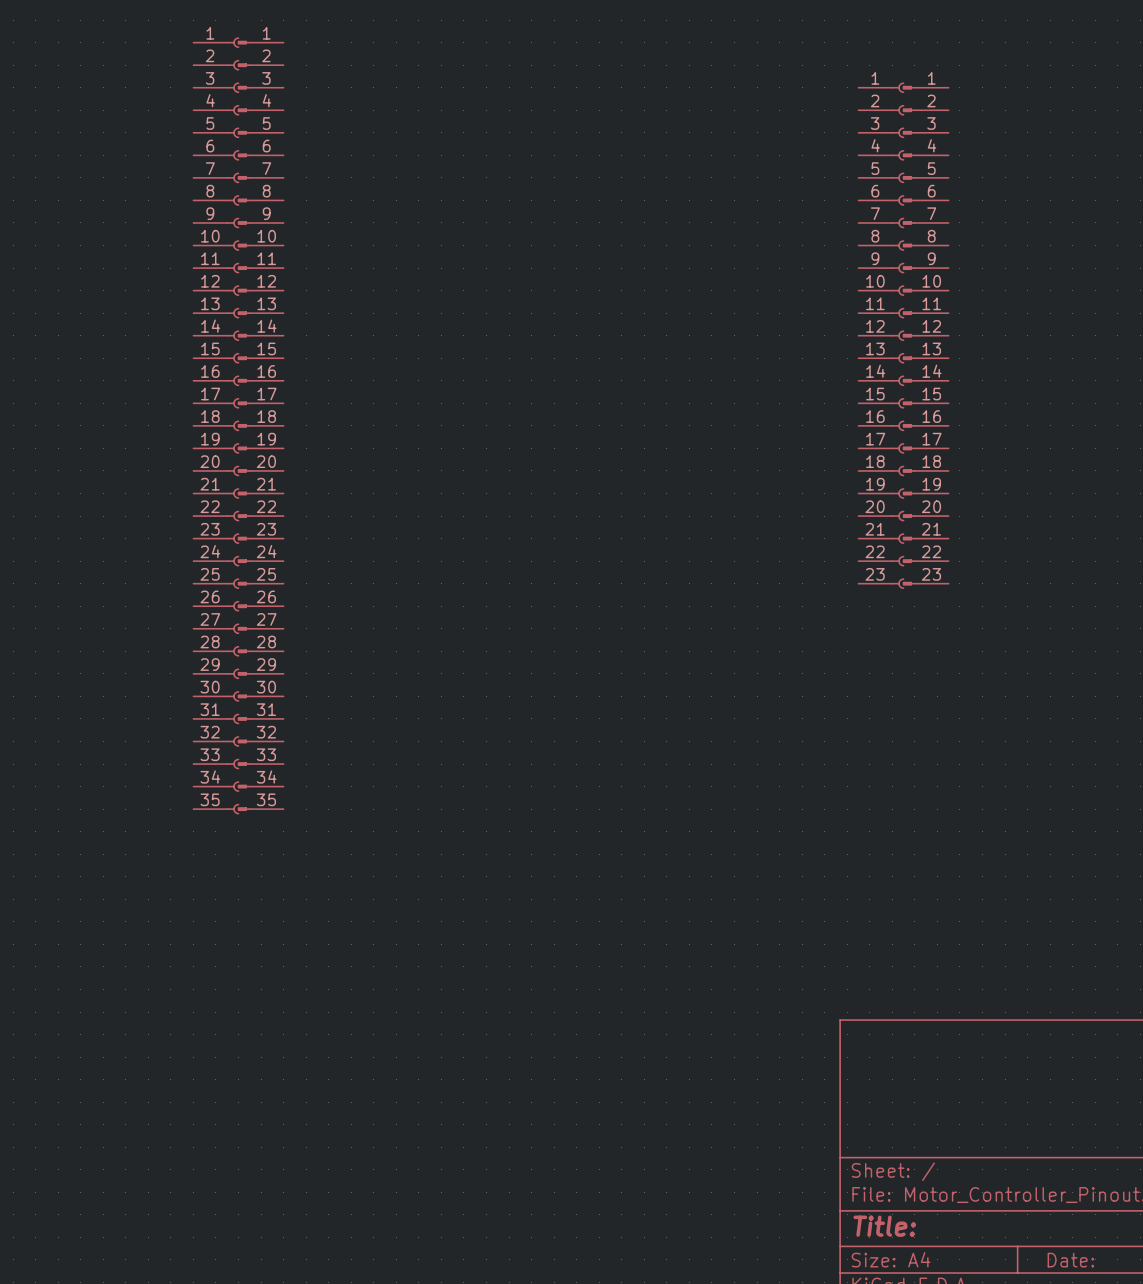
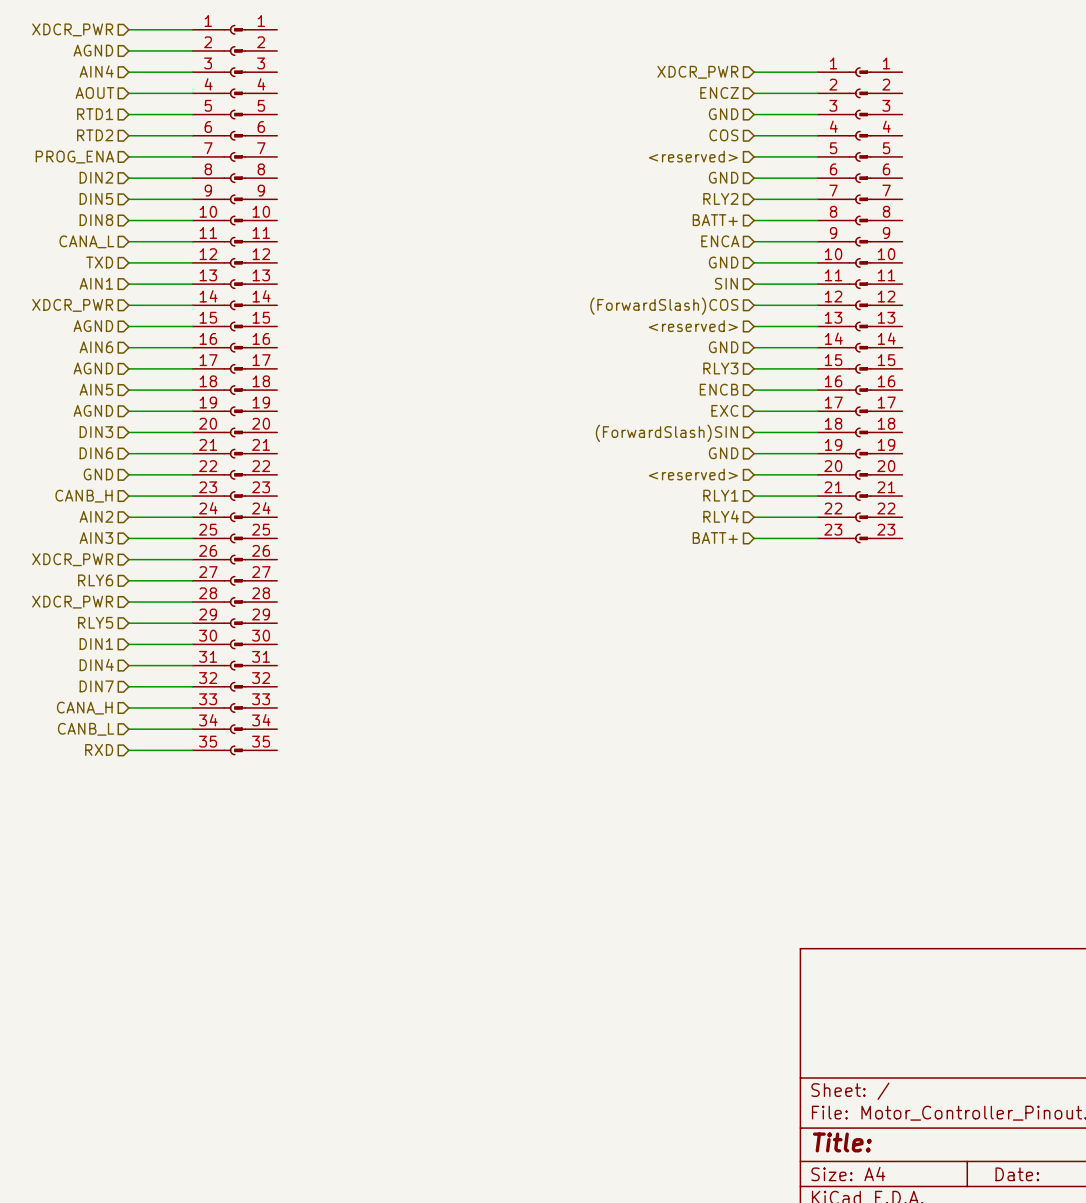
hierarchical label: none -> XDCR_PWR (72, 29)
wire: none -> (128, 29) (192, 29)
hierarchical label: none -> AGND (93, 50)
wire: none -> (128, 50) (192, 50)
hierarchical label: none -> AIN4 (96, 71)
wire: none -> (128, 72) (192, 72)
hierarchical label: none -> XDCR_PWR (697, 72)
wire: none -> (754, 72) (817, 72)
hierarchical label: none -> AOUT (94, 92)
hierarchical label: none -> ENCZ (719, 92)
wire: none -> (128, 93) (192, 93)
wire: none -> (754, 93) (817, 93)
hierarchical label: none -> RTD1 (95, 114)
wire: none -> (128, 114) (192, 114)
hierarchical label: none -> GND (723, 114)
wire: none -> (754, 114) (817, 114)
hierarchical label: none -> RTD2 (95, 135)
hierarchical label: none -> COS (723, 135)
wire: none -> (128, 135) (192, 135)
wire: none -> (754, 135) (817, 135)
wire: none -> (128, 156) (192, 156)
hierarchical label: none -> <reserved> (693, 156)
wire: none -> (754, 156) (817, 156)
hierarchical label: none -> PROG_ENA (74, 157)
hierarchical label: none -> DIN2 (96, 177)
wire: none -> (128, 178) (192, 178)
hierarchical label: none -> GND (723, 177)
wire: none -> (754, 178) (817, 178)
hierarchical label: none -> DIN5 (96, 198)
wire: none -> (128, 199) (192, 199)
hierarchical label: none -> RLY2 (720, 198)
wire: none -> (754, 199) (817, 199)
hierarchical label: none -> DIN8 (96, 220)
wire: none -> (128, 220) (192, 220)
hierarchical label: none -> BATT+ (715, 220)
wire: none -> (754, 220) (817, 220)
hierarchical label: none -> ENCA (720, 241)
hierarchical label: none -> CANA_L (86, 241)
wire: none -> (128, 241) (192, 241)
wire: none -> (754, 241) (817, 241)
hierarchical label: none -> TXD (99, 262)
wire: none -> (128, 262) (192, 262)
hierarchical label: none -> GND (723, 262)
wire: none -> (754, 262) (817, 262)
hierarchical label: none -> AIN1 (96, 283)
hierarchical label: none -> SIN (726, 283)
wire: none -> (128, 284) (192, 284)
wire: none -> (754, 284) (817, 284)
hierarchical label: none -> XDCR_PWR (72, 305)
wire: none -> (128, 305) (192, 305)
wire: none -> (754, 305) (817, 305)
hierarchical label: none -> (ForwardSlash)COS (664, 306)
hierarchical label: none -> AGND (93, 326)
hierarchical label: none -> <reserved> (693, 326)
wire: none -> (128, 326) (192, 326)
wire: none -> (754, 326) (817, 326)
hierarchical label: none -> AIN6 (96, 347)
wire: none -> (128, 347) (192, 347)
hierarchical label: none -> GND (723, 347)
wire: none -> (754, 347) (817, 347)
hierarchical label: none -> AGND (93, 368)
hierarchical label: none -> RLY3 (720, 368)
wire: none -> (128, 368) (192, 368)
wire: none -> (754, 368) (817, 368)
hierarchical label: none -> AIN5 (96, 389)
wire: none -> (128, 390) (192, 390)
hierarchical label: none -> ENCB (719, 389)
wire: none -> (754, 390) (817, 390)
hierarchical label: none -> AGND (93, 410)
wire: none -> (128, 411) (192, 411)
hierarchical label: none -> EXC (724, 410)
wire: none -> (754, 411) (817, 411)
hierarchical label: none -> DIN3 (96, 432)
wire: none -> (128, 432) (192, 432)
wire: none -> (754, 432) (817, 432)
hierarchical label: none -> (ForwardSlash)SIN (666, 433)
hierarchical label: none -> DIN6 (96, 453)
wire: none -> (128, 453) (192, 453)
hierarchical label: none -> GND (723, 453)
wire: none -> (754, 453) (817, 453)
hierarchical label: none -> GND (98, 474)
hierarchical label: none -> <reserved> (693, 474)
wire: none -> (128, 474) (192, 474)
wire: none -> (754, 474) (817, 474)
hierarchical label: none -> CANB_H (84, 496)
wire: none -> (128, 496) (192, 496)
hierarchical label: none -> RLY1 (720, 495)
wire: none -> (754, 496) (817, 496)
hierarchical label: none -> AIN2 (96, 516)
hierarchical label: none -> RLY4 (721, 516)
wire: none -> (128, 517) (192, 517)
wire: none -> (754, 517) (817, 517)
hierarchical label: none -> AIN3 (96, 538)
wire: none -> (128, 538) (192, 538)
hierarchical label: none -> BATT+ (715, 538)
wire: none -> (754, 538) (817, 538)
hierarchical label: none -> XDCR_PWR (72, 559)
wire: none -> (128, 559) (192, 559)
hierarchical label: none -> RLY6 (95, 580)
wire: none -> (128, 580) (192, 580)
hierarchical label: none -> XDCR_PWR (72, 602)
wire: none -> (128, 602) (192, 602)
hierarchical label: none -> RLY5 (95, 622)
wire: none -> (128, 623) (192, 623)
hierarchical label: none -> DIN1 (96, 644)
wire: none -> (128, 644) (192, 644)
hierarchical label: none -> DIN4 (96, 664)
wire: none -> (128, 665) (192, 665)
hierarchical label: none -> DIN7 (96, 686)
wire: none -> (128, 686) (192, 686)
hierarchical label: none -> CANA_H (84, 708)
wire: none -> (128, 707) (192, 707)
hierarchical label: none -> CANB_L (86, 729)
wire: none -> (128, 729) (192, 729)
hierarchical label: none -> RXD (99, 749)
wire: none -> (128, 750) (192, 750)

